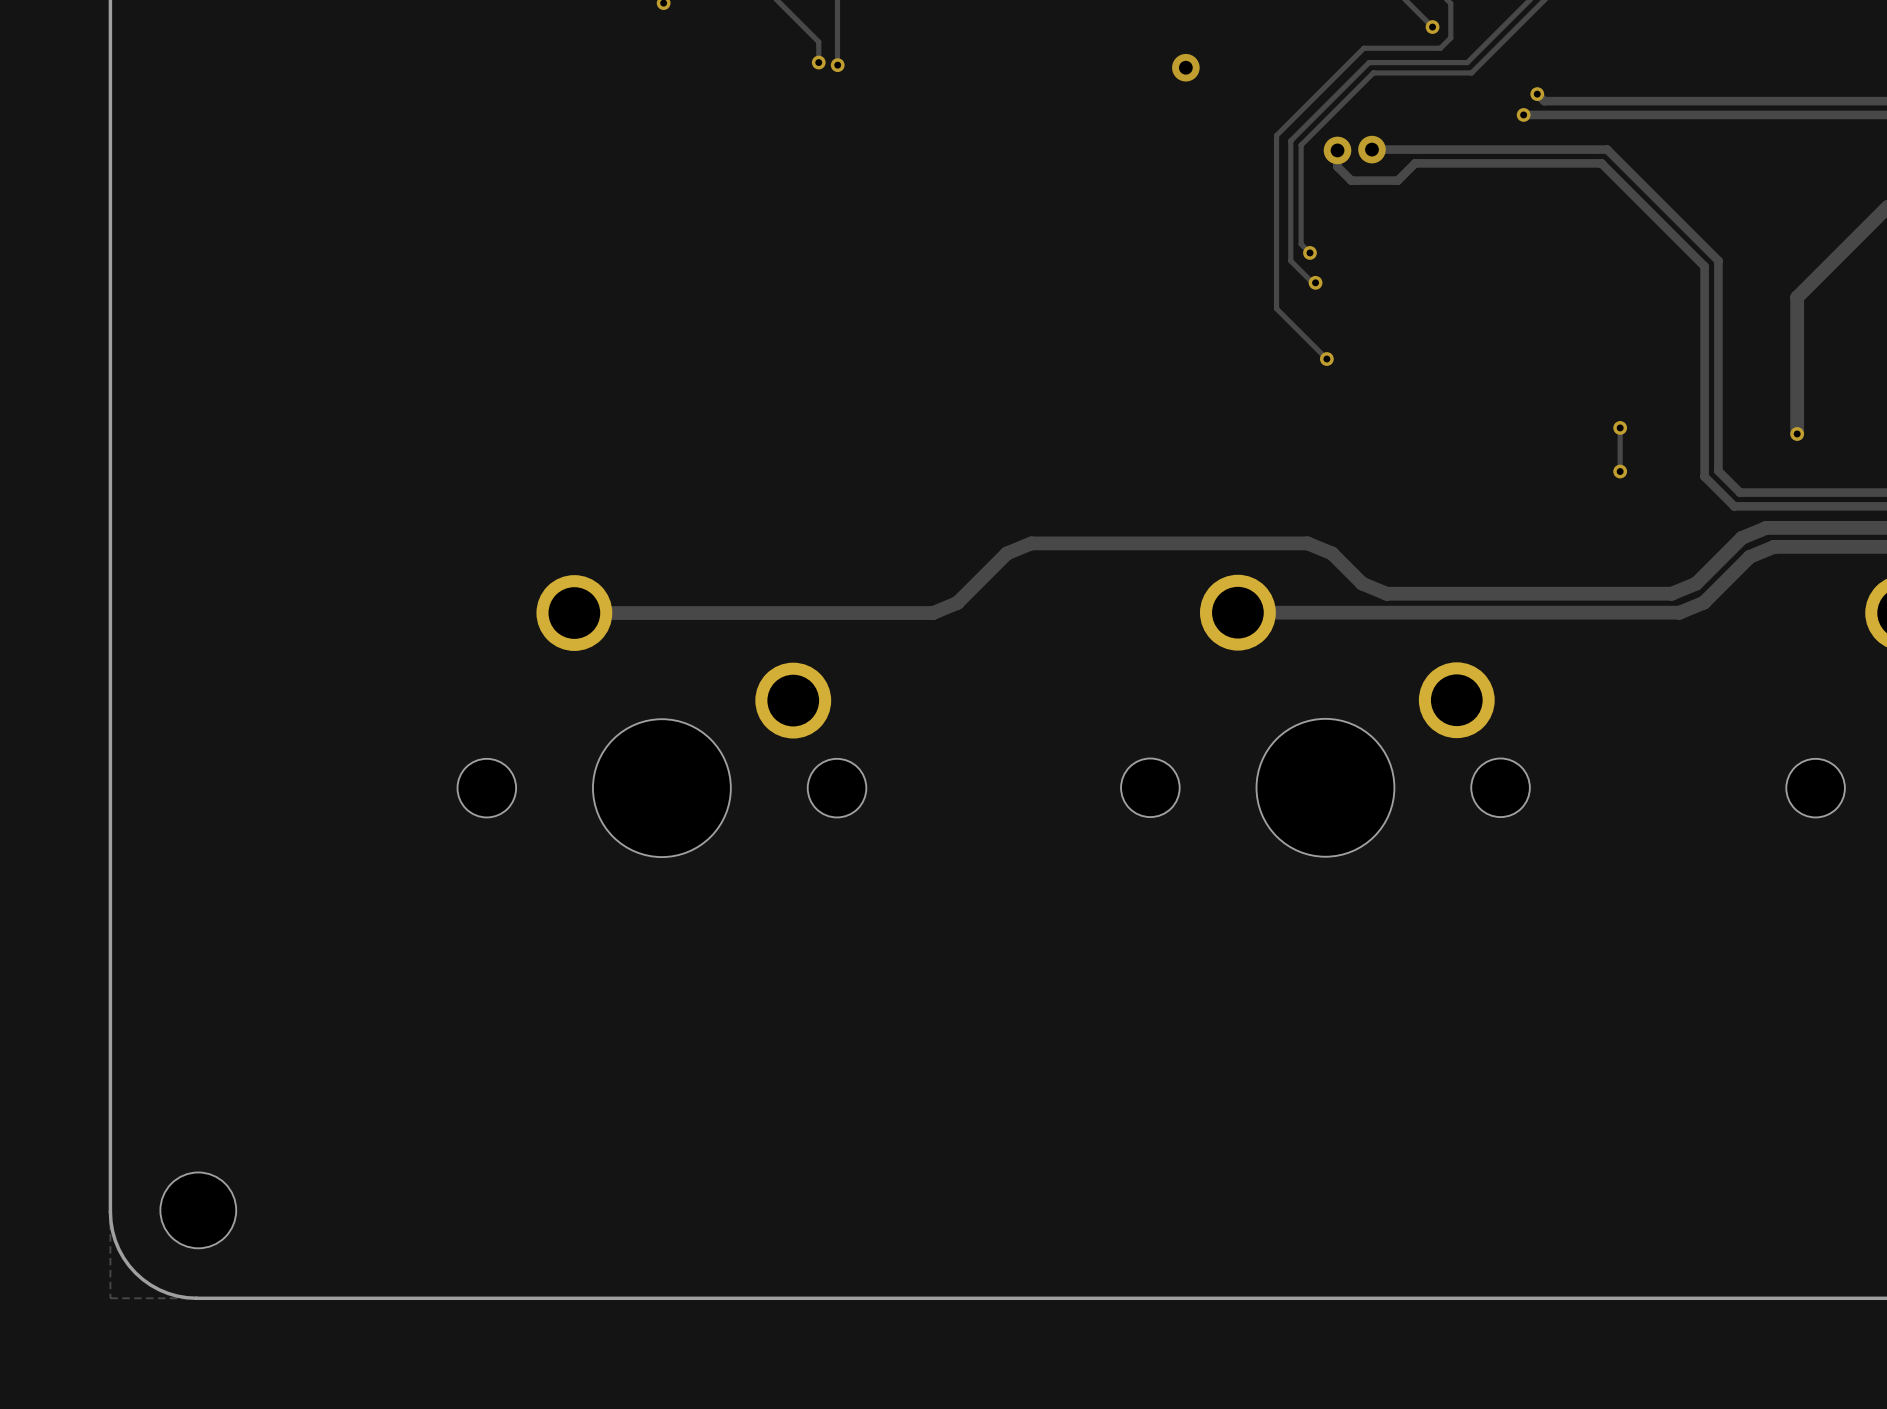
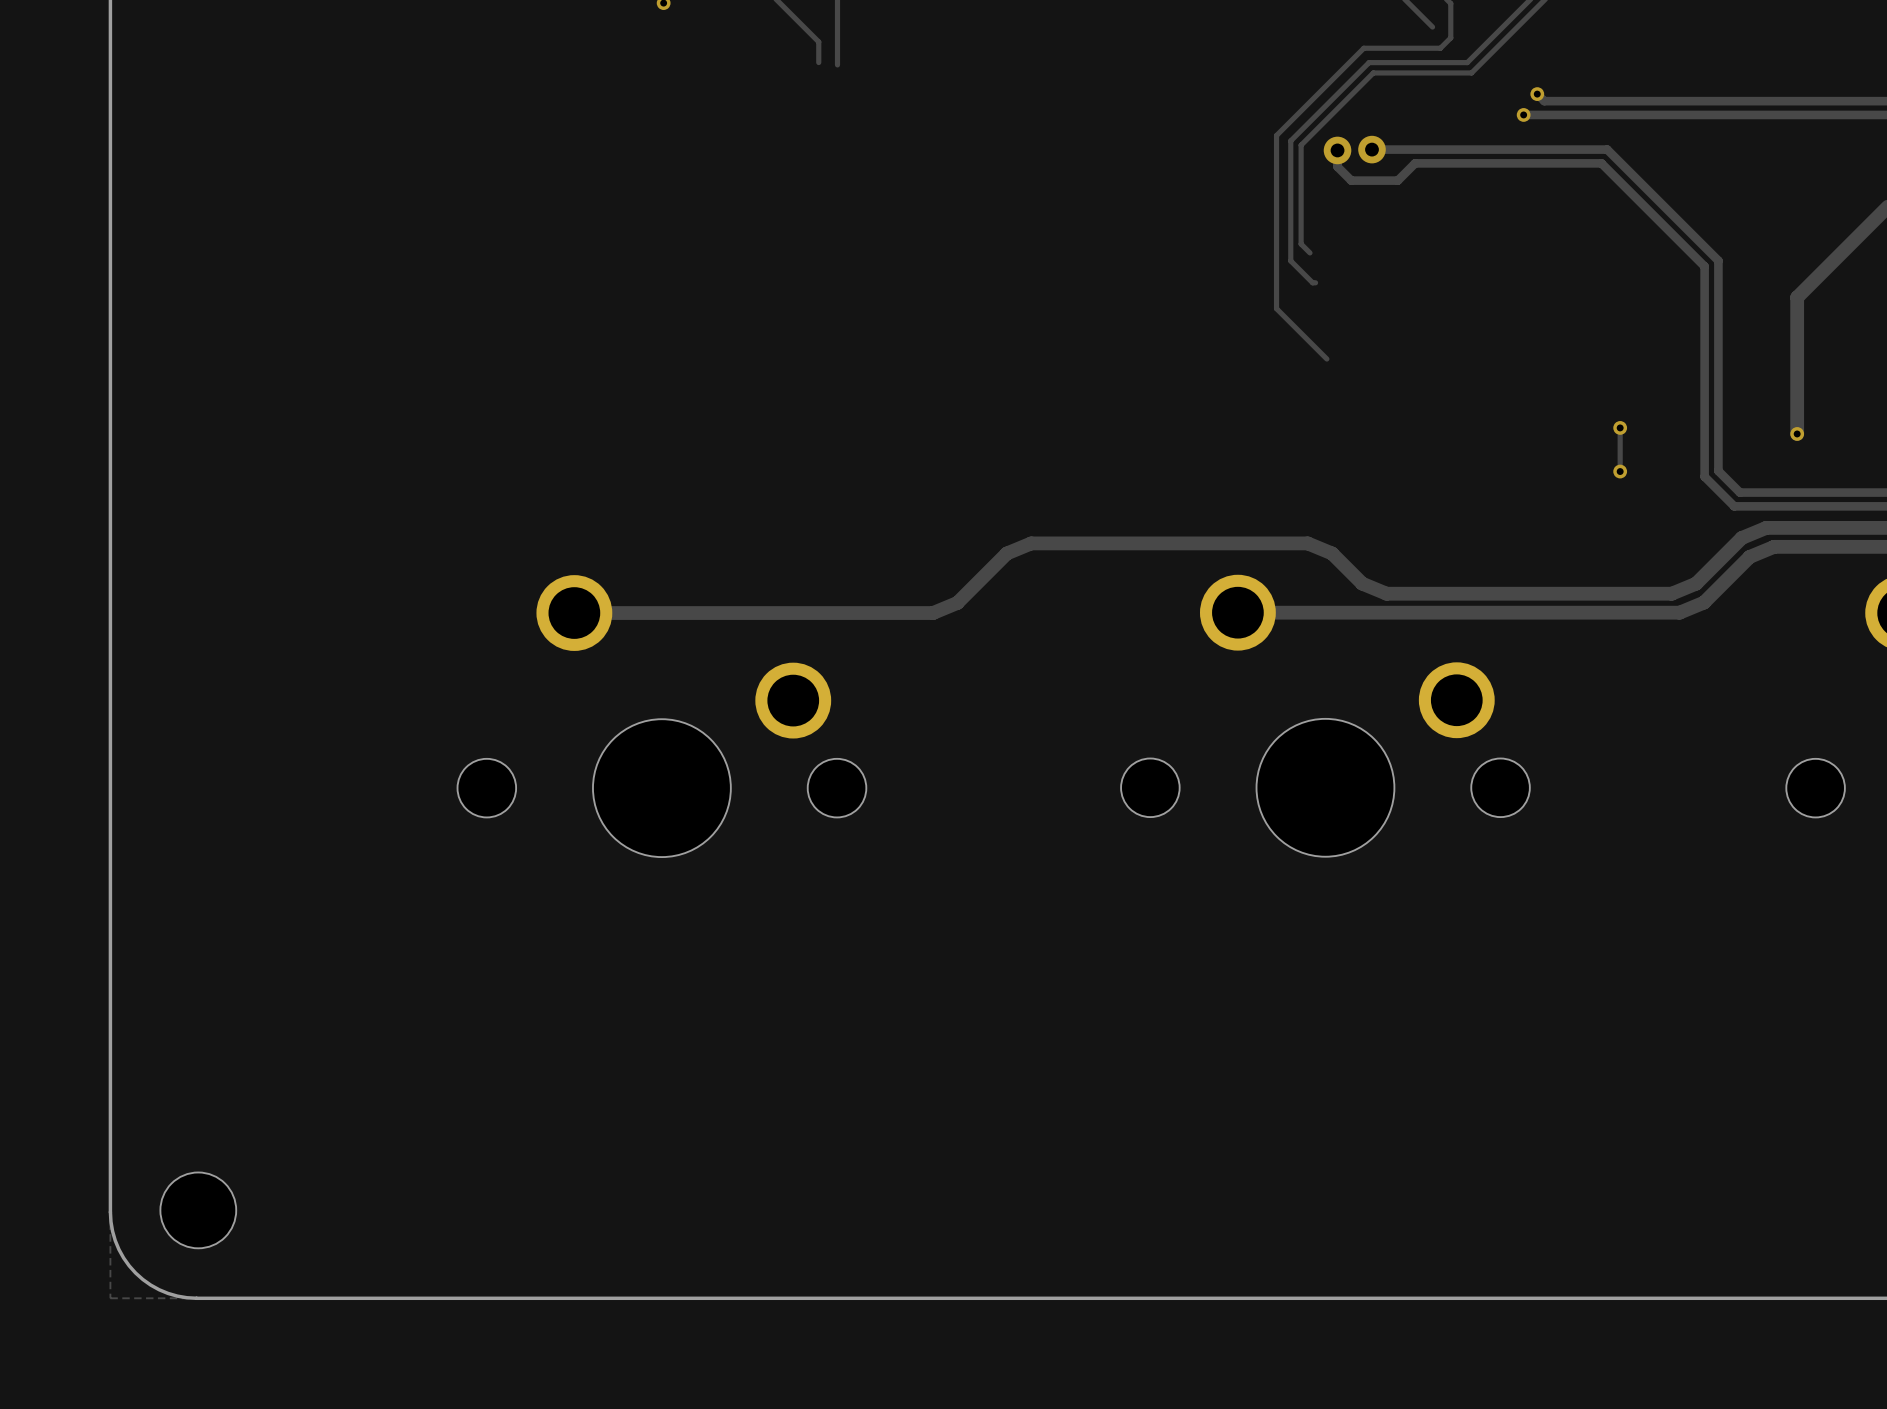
via: (1432, 27) -> none
via: (818, 62) -> none
via: (837, 65) -> none
via: (1185, 67) -> none
via: (1309, 252) -> none
via: (1315, 282) -> none
via: (1326, 359) -> none

